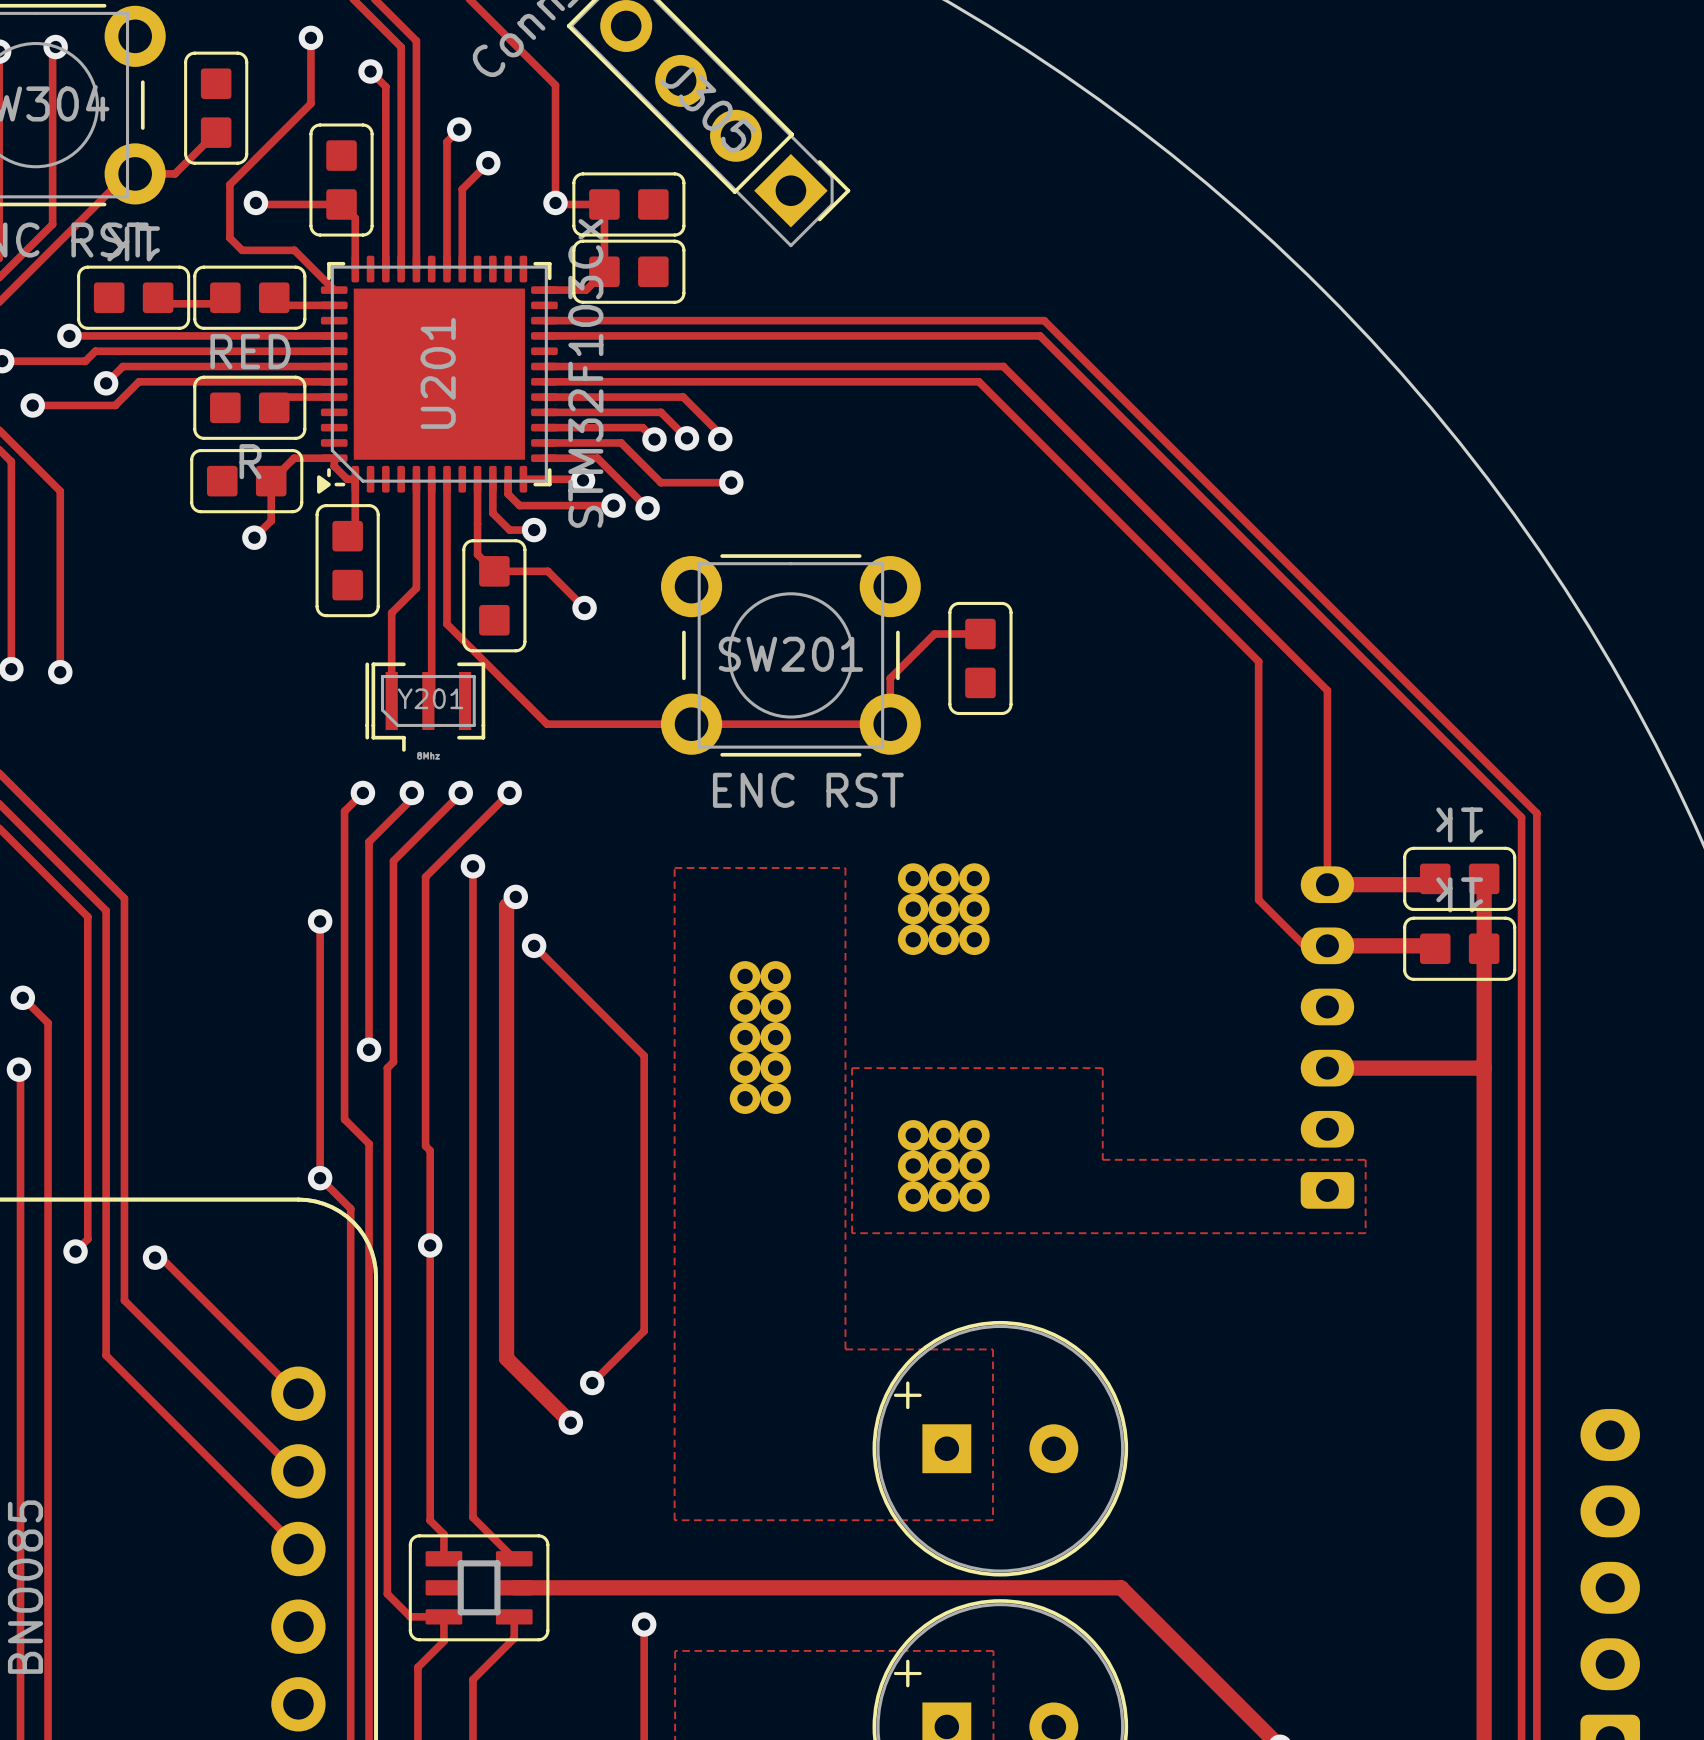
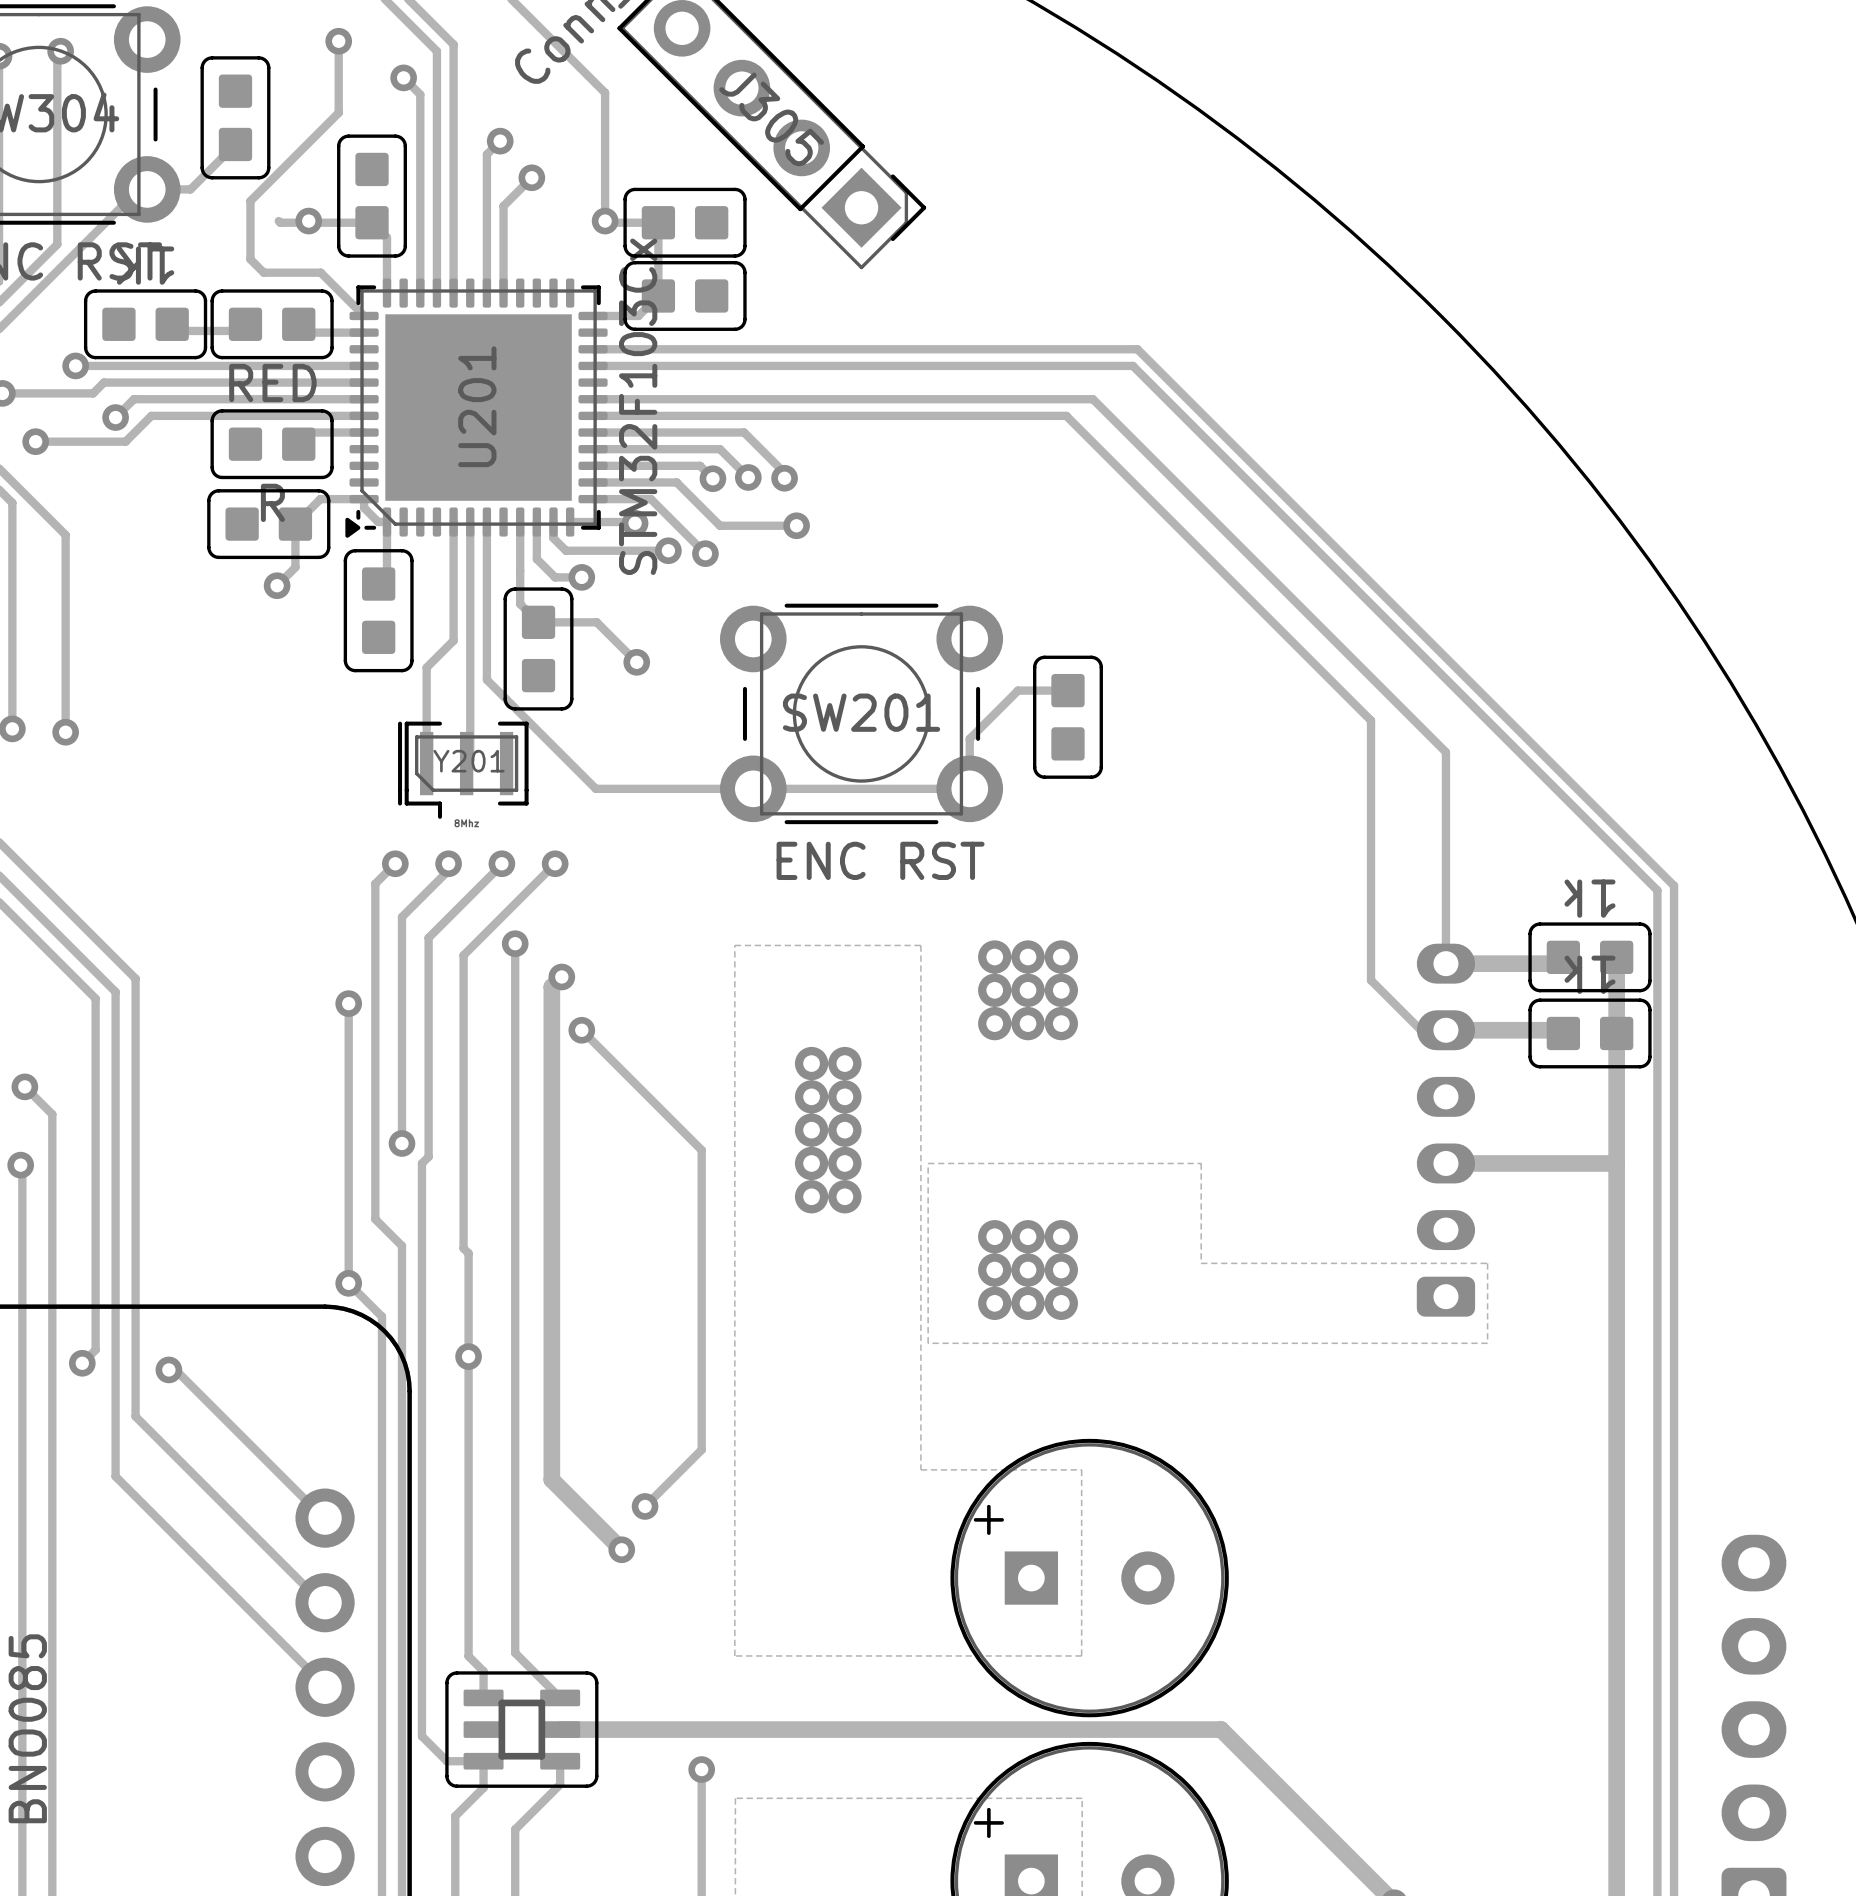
via position: (255, 202) -> (308, 221)

